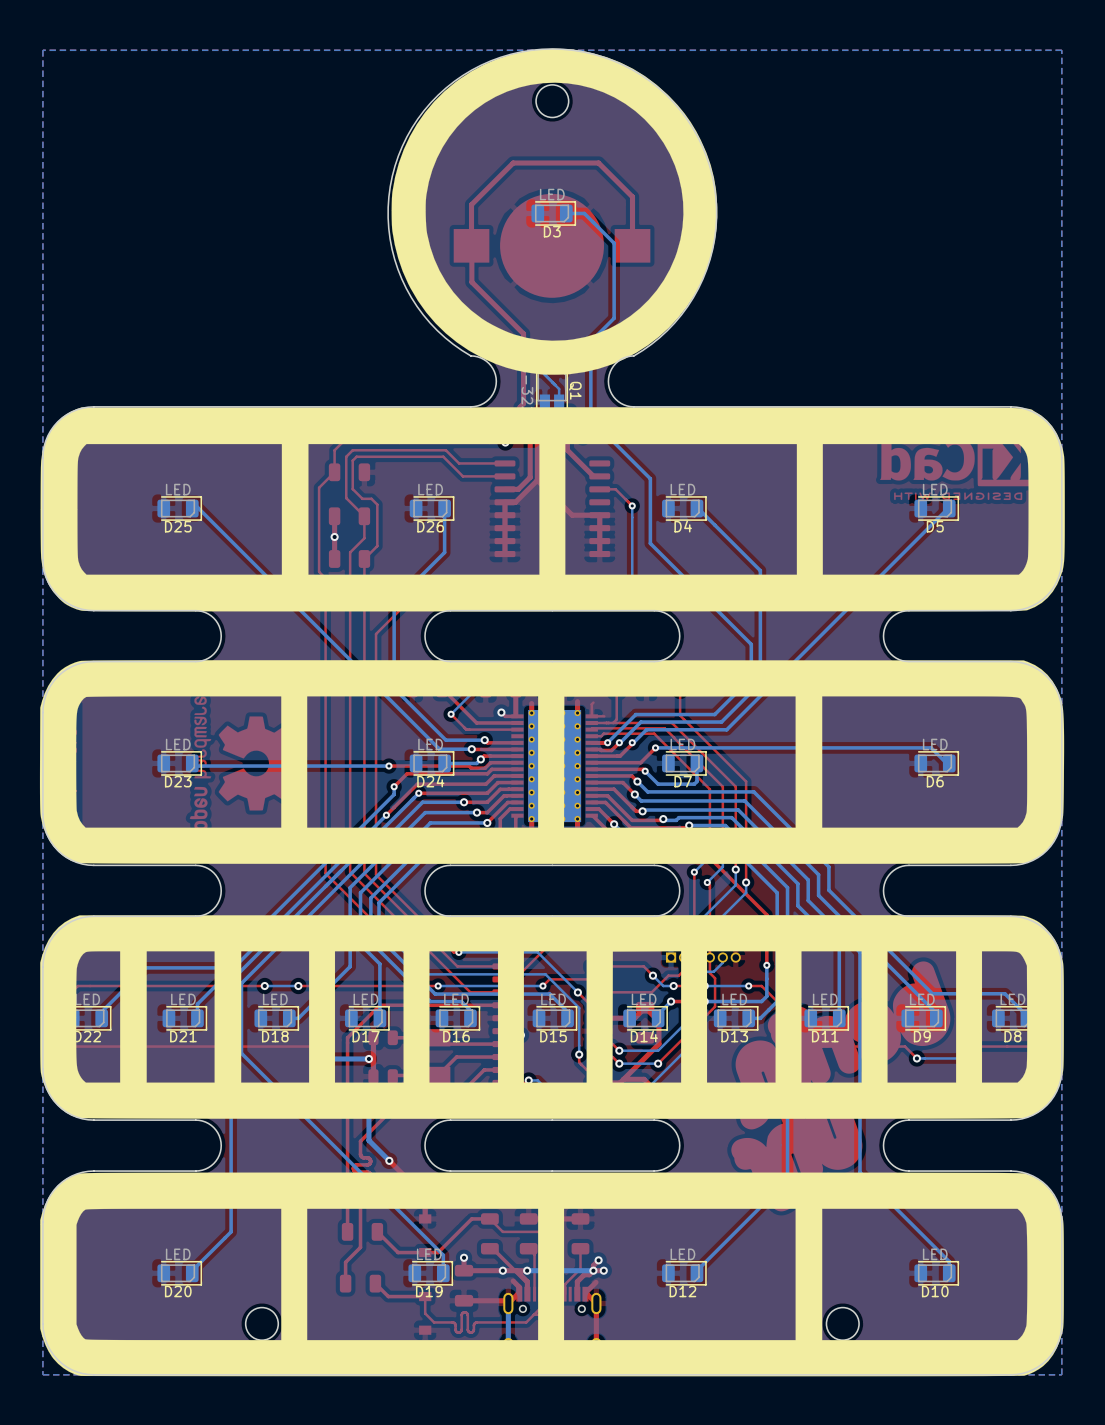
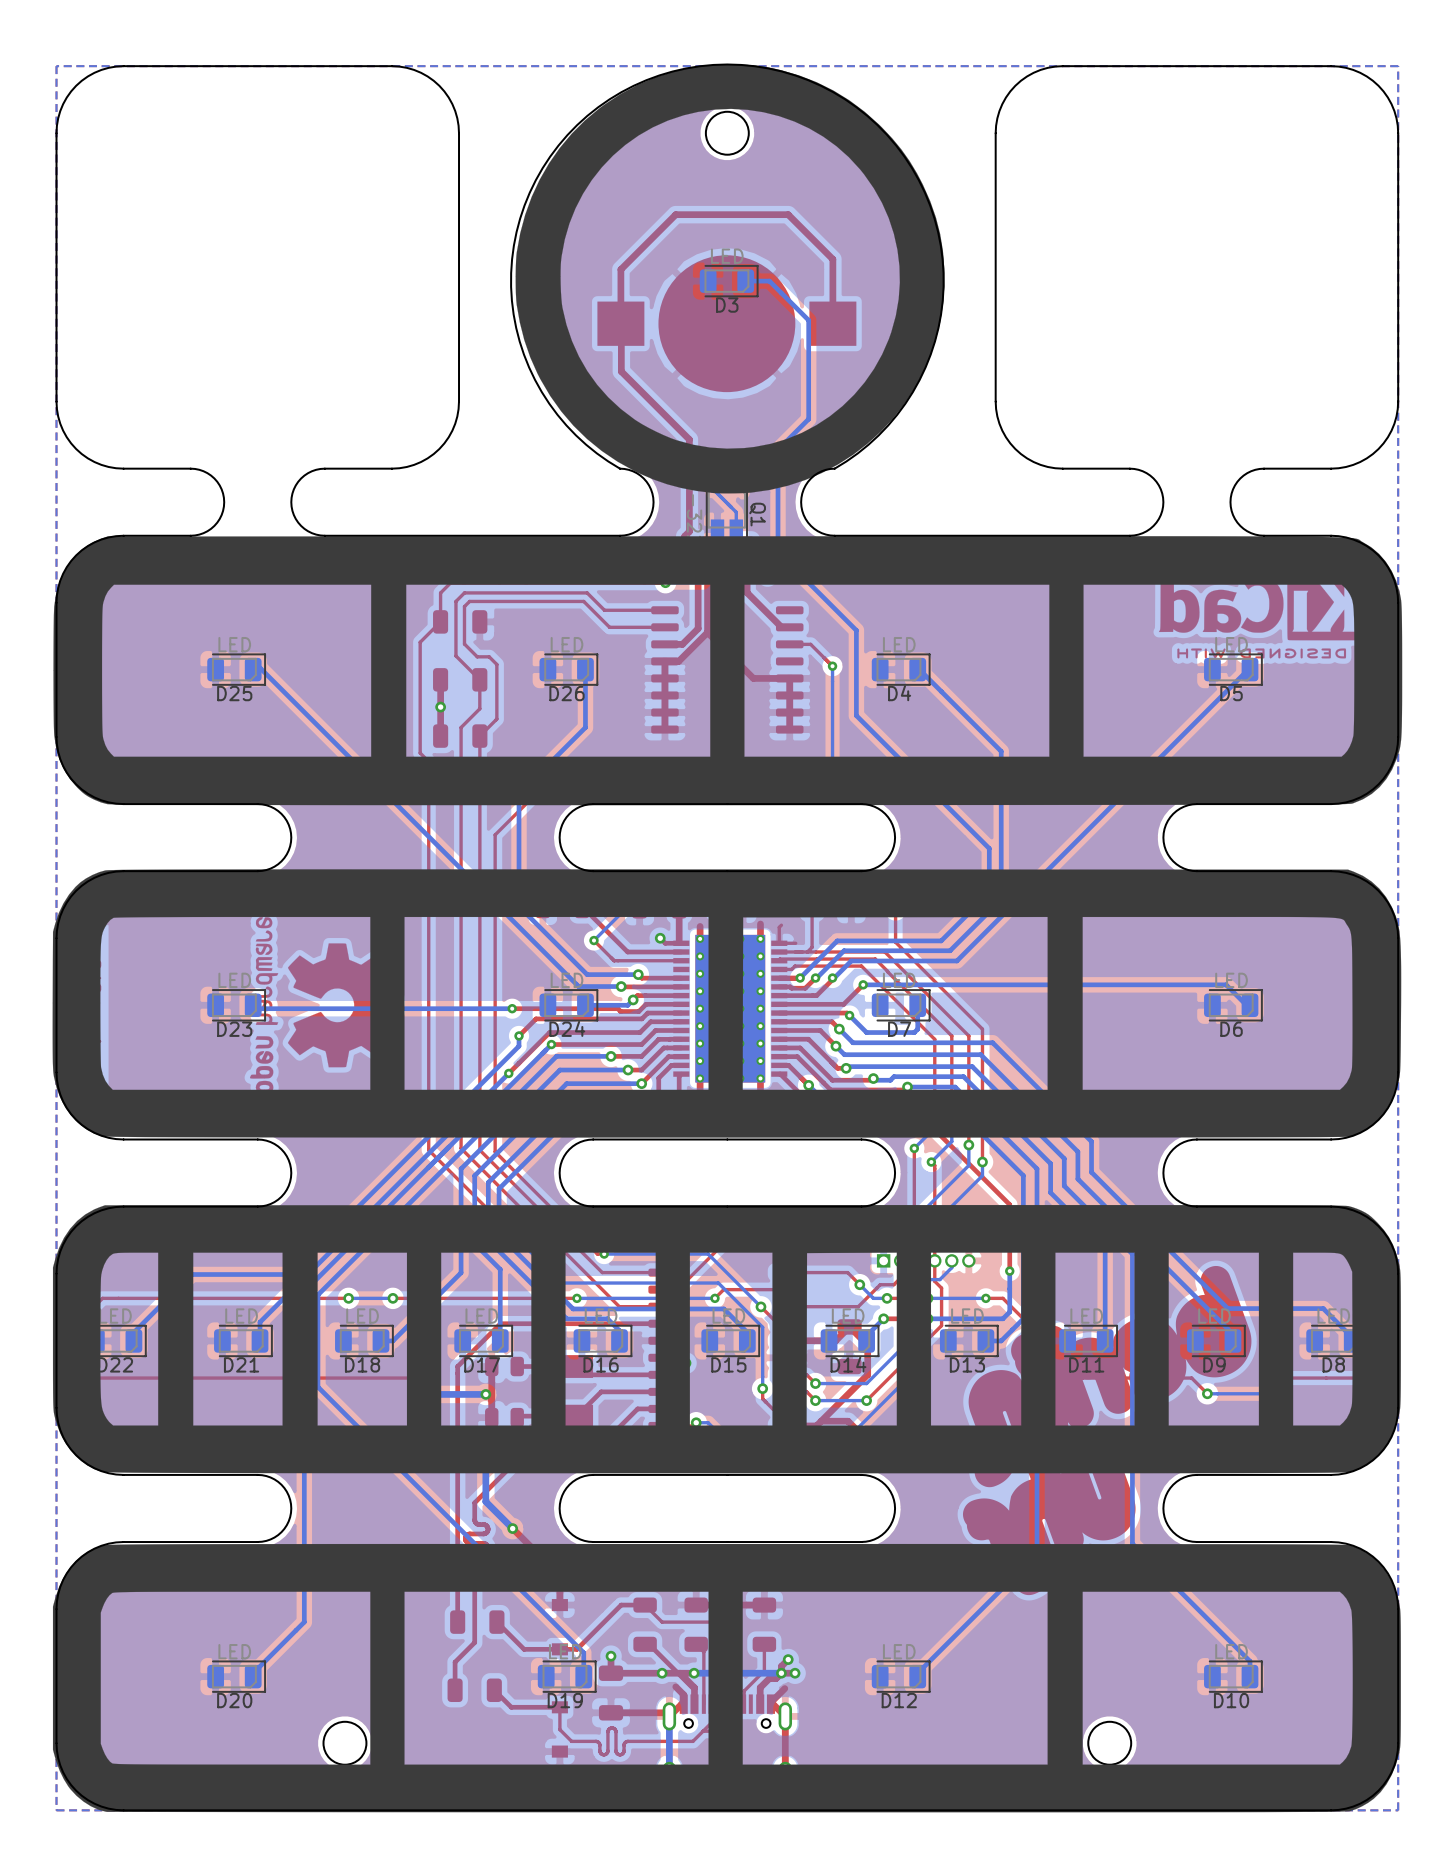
board edge: (246, 406) (144, 406) -> (324, 535) (312, 533) (304, 528) (293, 515) (291, 497) (295, 485) (301, 478) (312, 471) (320, 468) (399, 468) (421, 462) (439, 449) (448, 437) (455, 423) (458, 409) (459, 133) (457, 118) (452, 104) (439, 85) (421, 72) (399, 66) (116, 66) (101, 69) (87, 76) (76, 85) (63, 104) (58, 118) (56, 133) (56, 401) (60, 423) (66, 437) (76, 449) (87, 458) (101, 464) (123, 468) (195, 468) (211, 475) (219, 485) (223, 493) (223, 510) (219, 518) (211, 528) (203, 533) (190, 535)
board edge: (959, 406) (858, 406) -> (1264, 535) (1255, 534) (1243, 528) (1233, 515) (1230, 497) (1234, 485) (1240, 478) (1247, 473) (1259, 468) (1338, 468) (1360, 462) (1378, 449) (1387, 437) (1394, 423) (1397, 409) (1398, 133) (1396, 118) (1387, 97) (1378, 85) (1360, 72) (1338, 66) (1055, 66) (1033, 72) (1020, 80) (1010, 91) (1002, 104) (997, 118) (995, 133) (995, 401) (999, 423) (1005, 437) (1015, 449) (1027, 458) (1040, 464) (1062, 468) (1134, 468) (1150, 475) (1156, 481) (1162, 493) (1163, 502) (1160, 515) (1150, 528) (1138, 534) (1129, 535)

